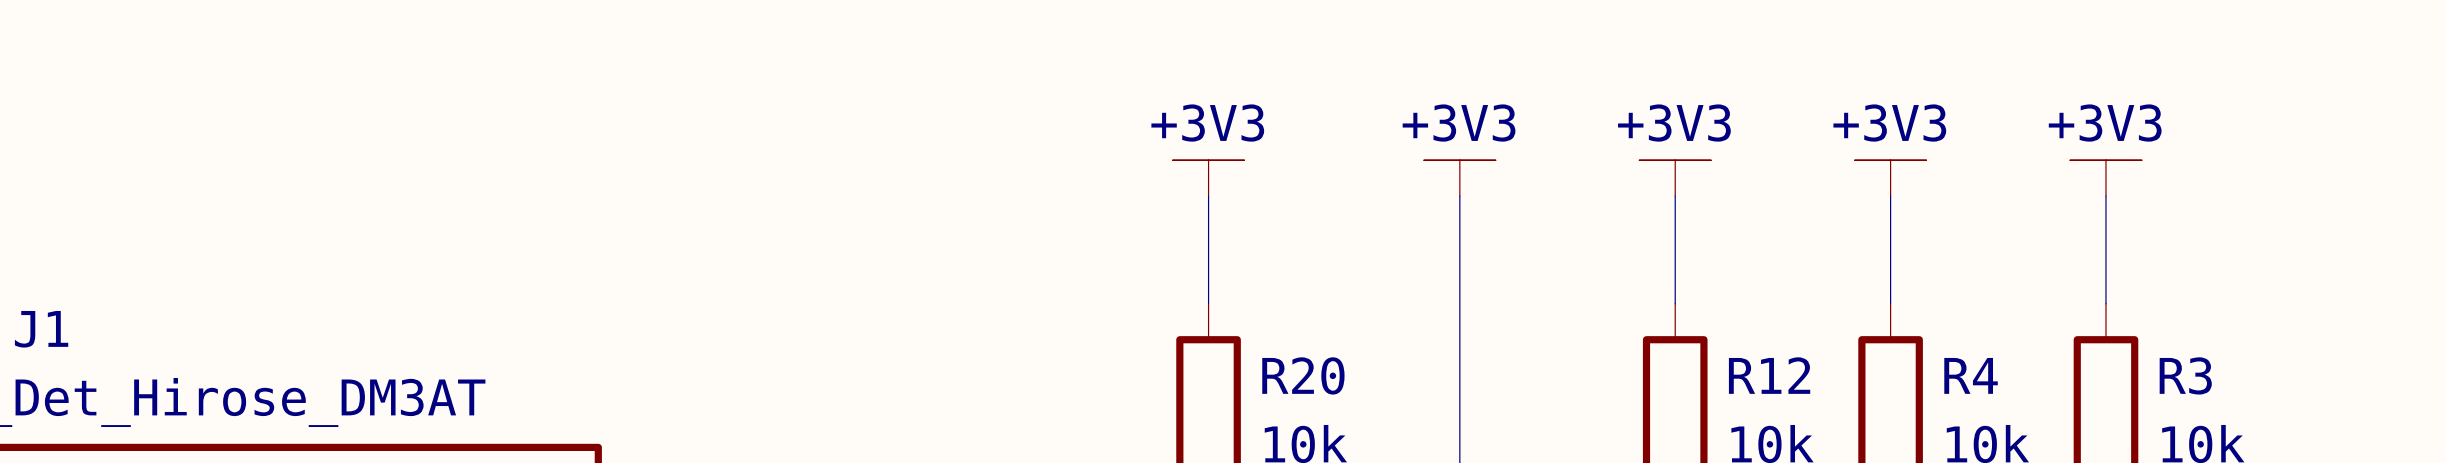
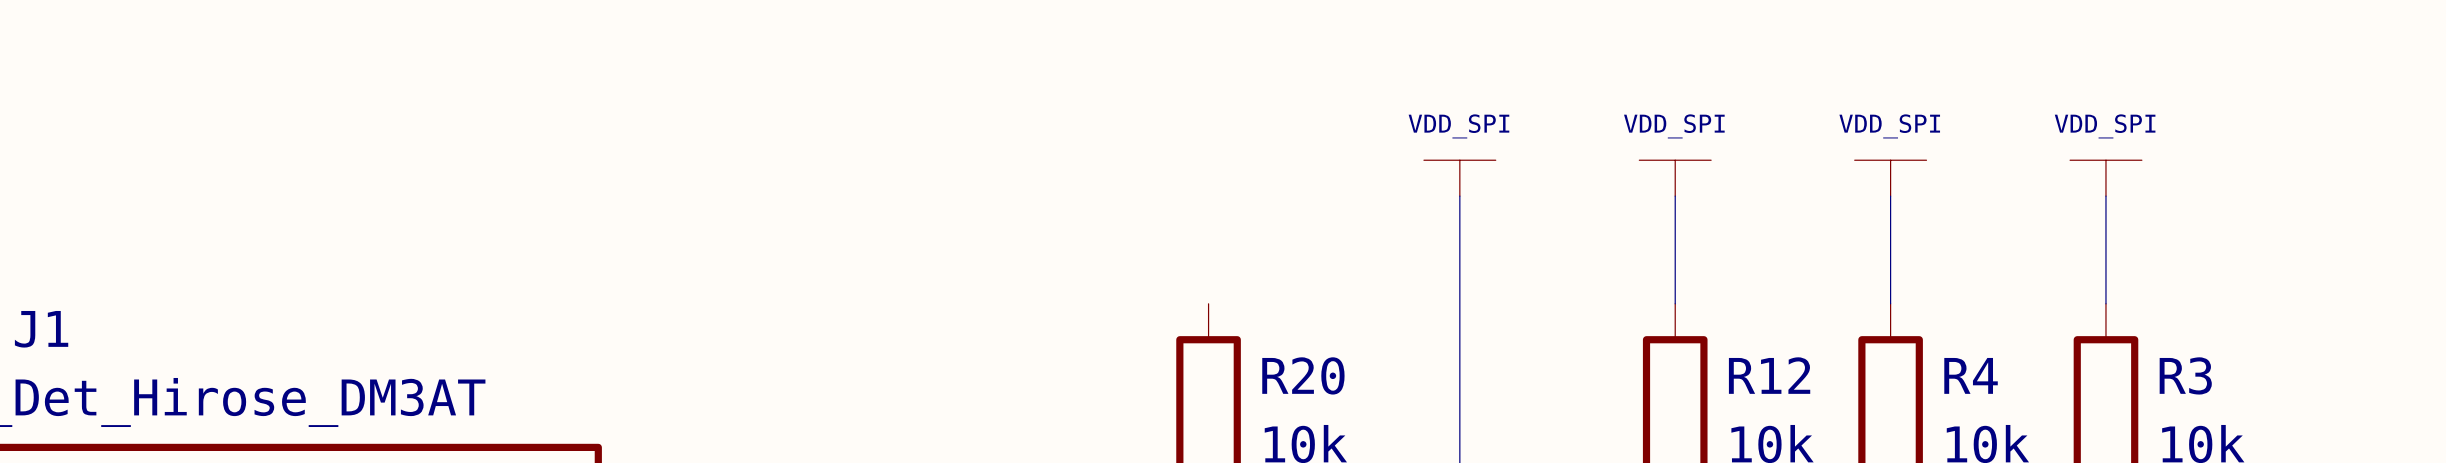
power symbol: +3V3 (1208, 178) -> none
power symbol: +3V3 (1459, 178) -> VDD_SPI (1459, 178)
power symbol: +3V3 (1675, 178) -> VDD_SPI (1675, 178)
power symbol: +3V3 (1890, 178) -> VDD_SPI (1890, 178)
power symbol: +3V3 (2105, 178) -> VDD_SPI (2105, 178)
wire: (1208, 196) (1208, 303) -> none

